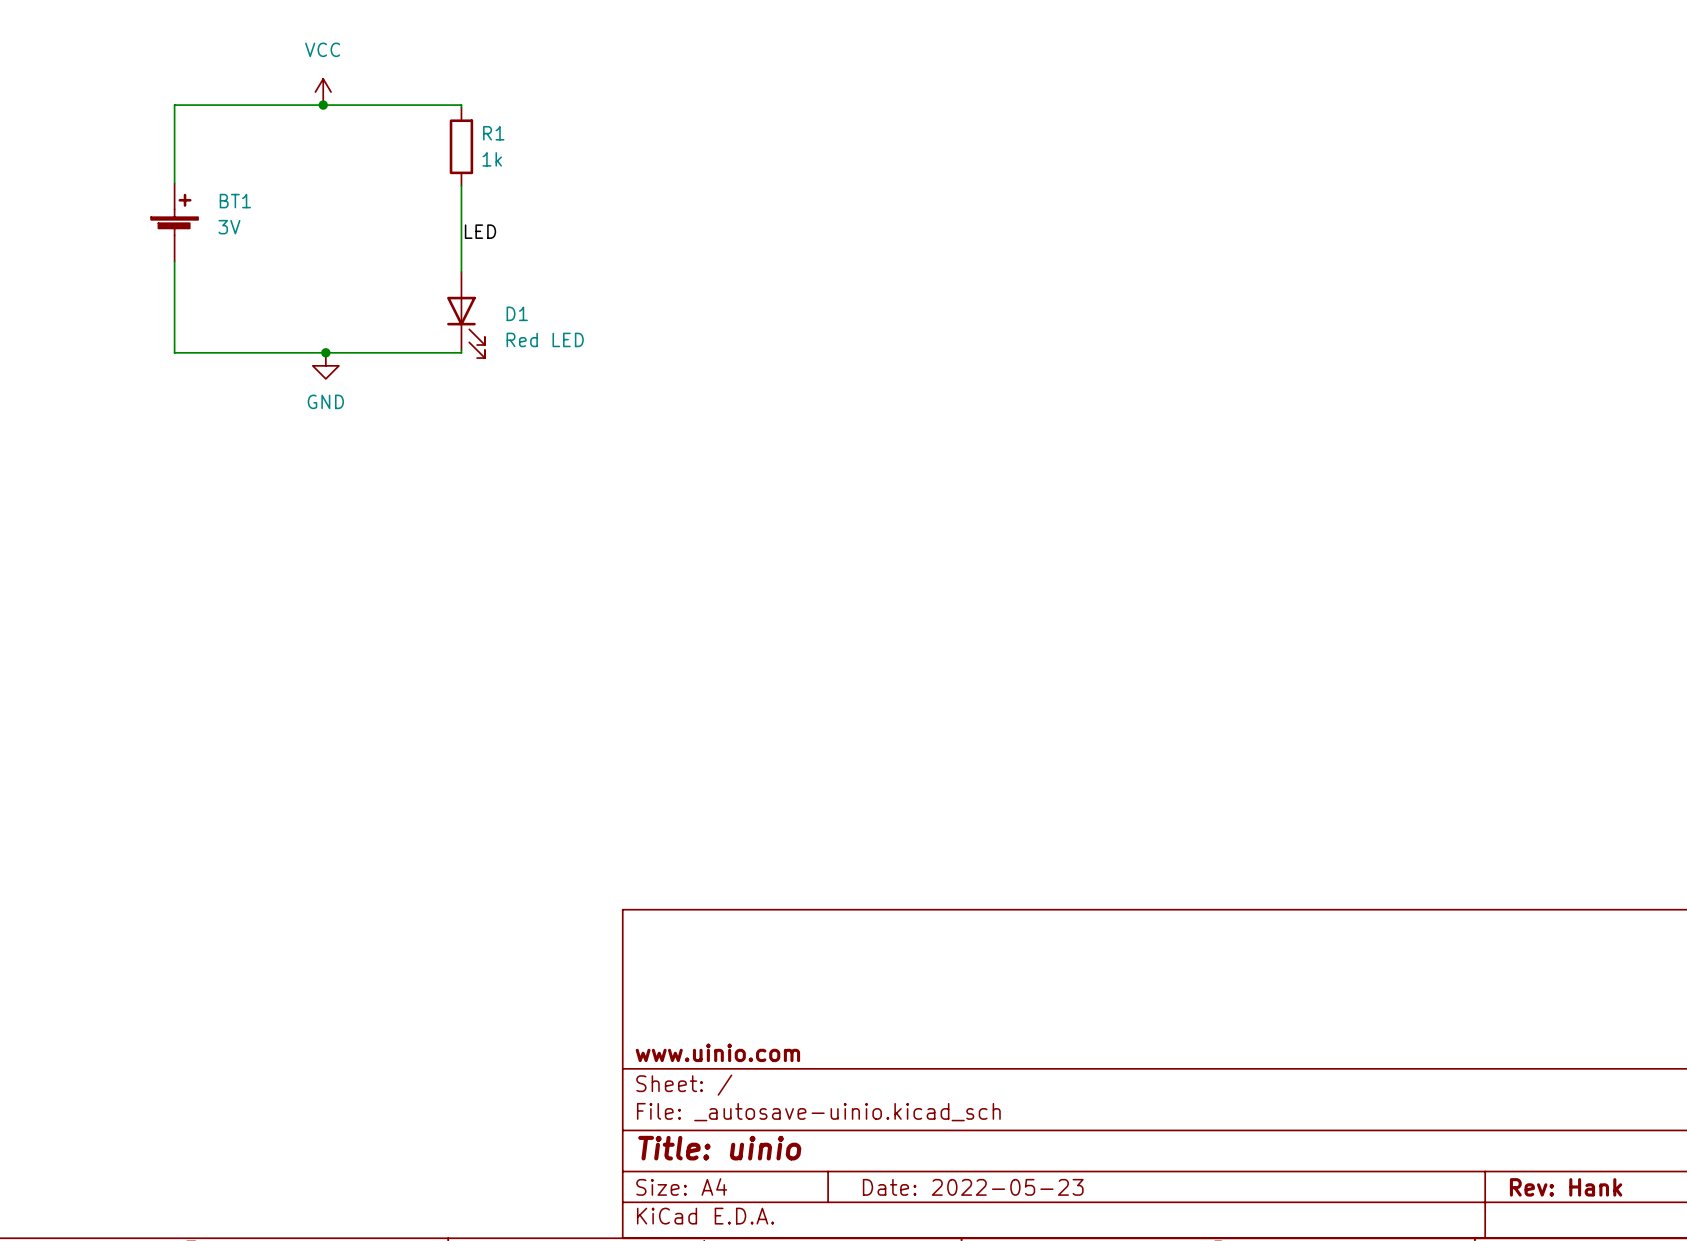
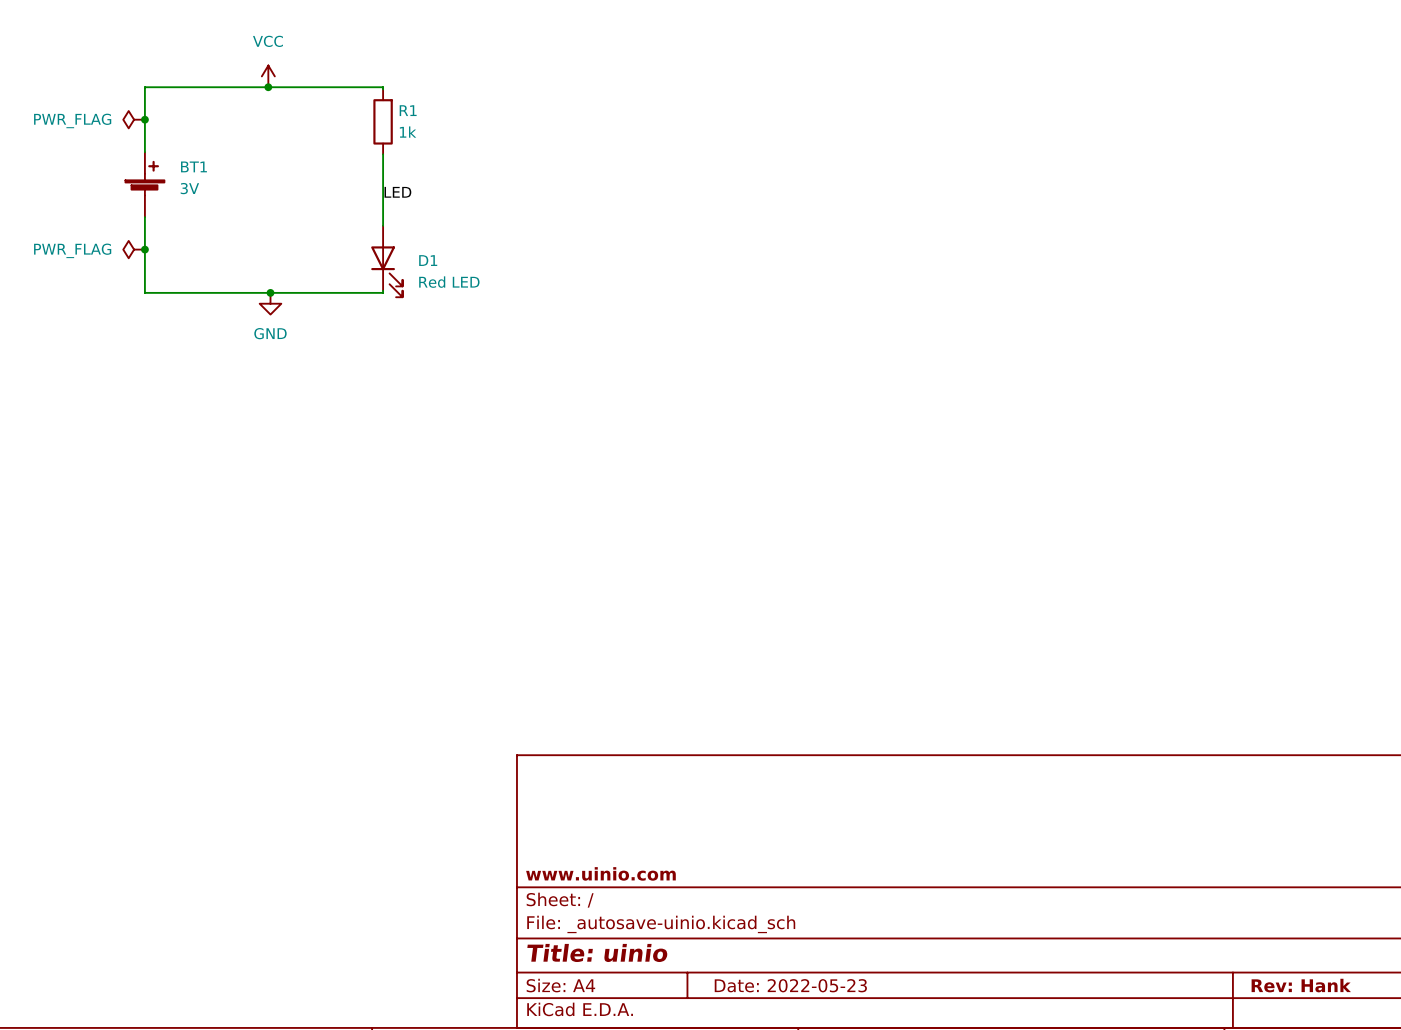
power symbol: none -> PWR_FLAG (134, 119)
junction: none -> (144, 119)
power symbol: none -> PWR_FLAG (134, 249)
junction: none -> (144, 249)

